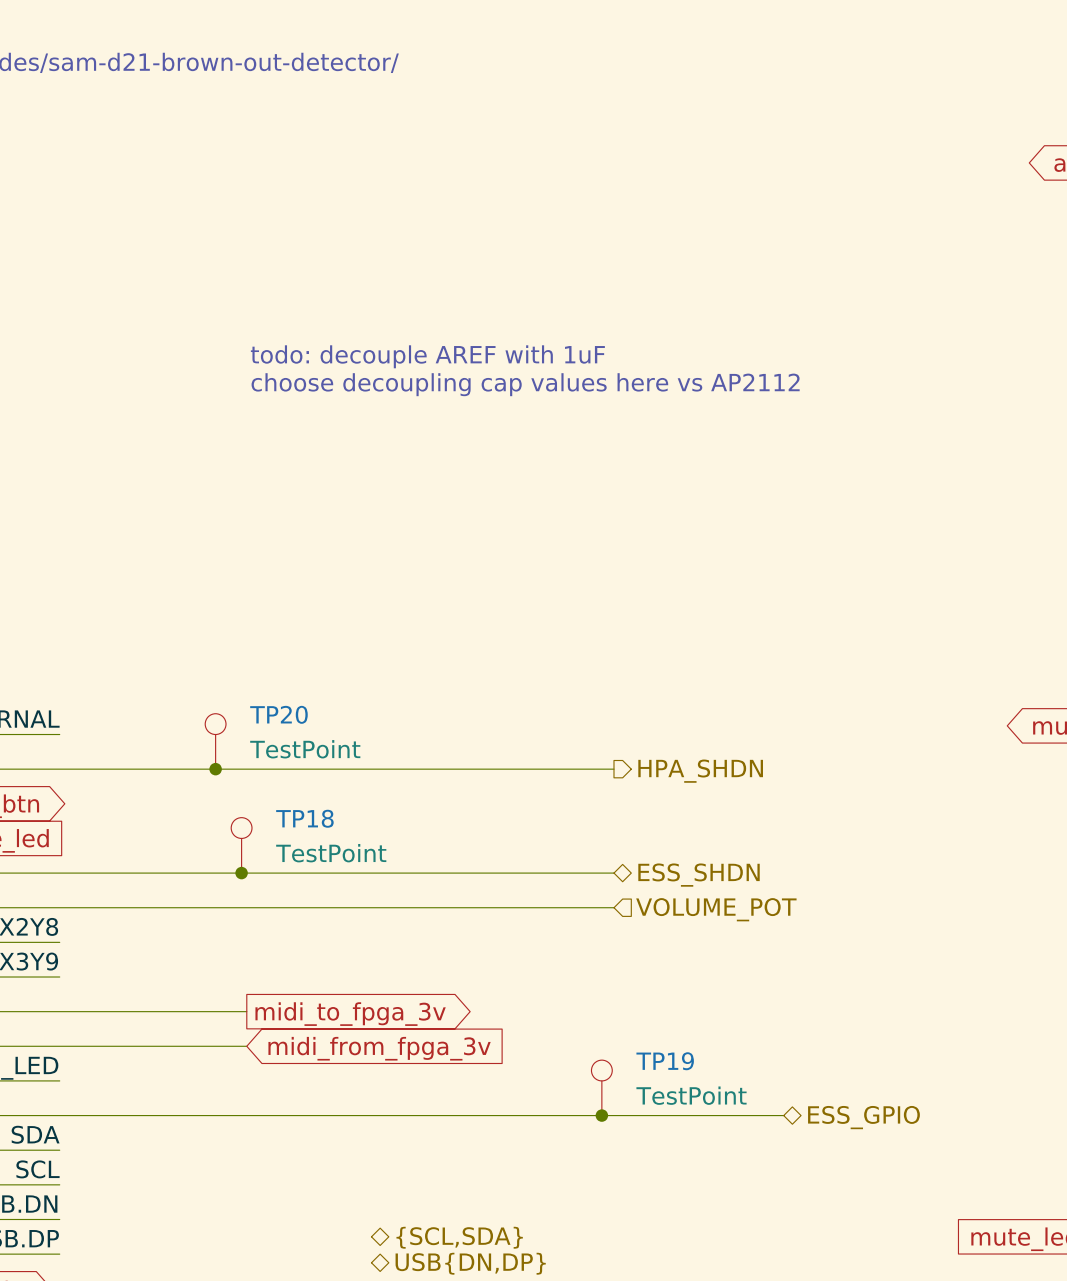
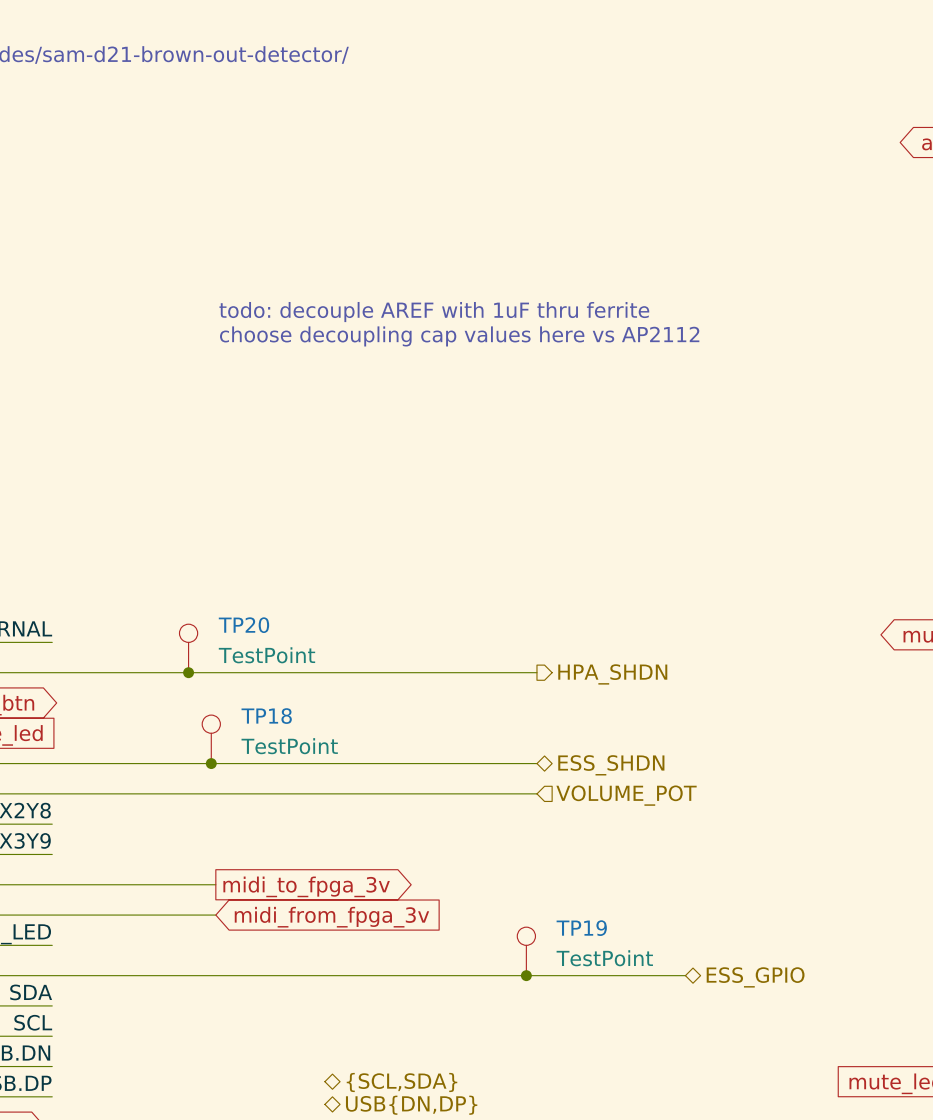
text: todo: decouple AREF with 1uF (427, 356) -> todo: decouple AREF with 1uF thru ferrite (434, 312)

